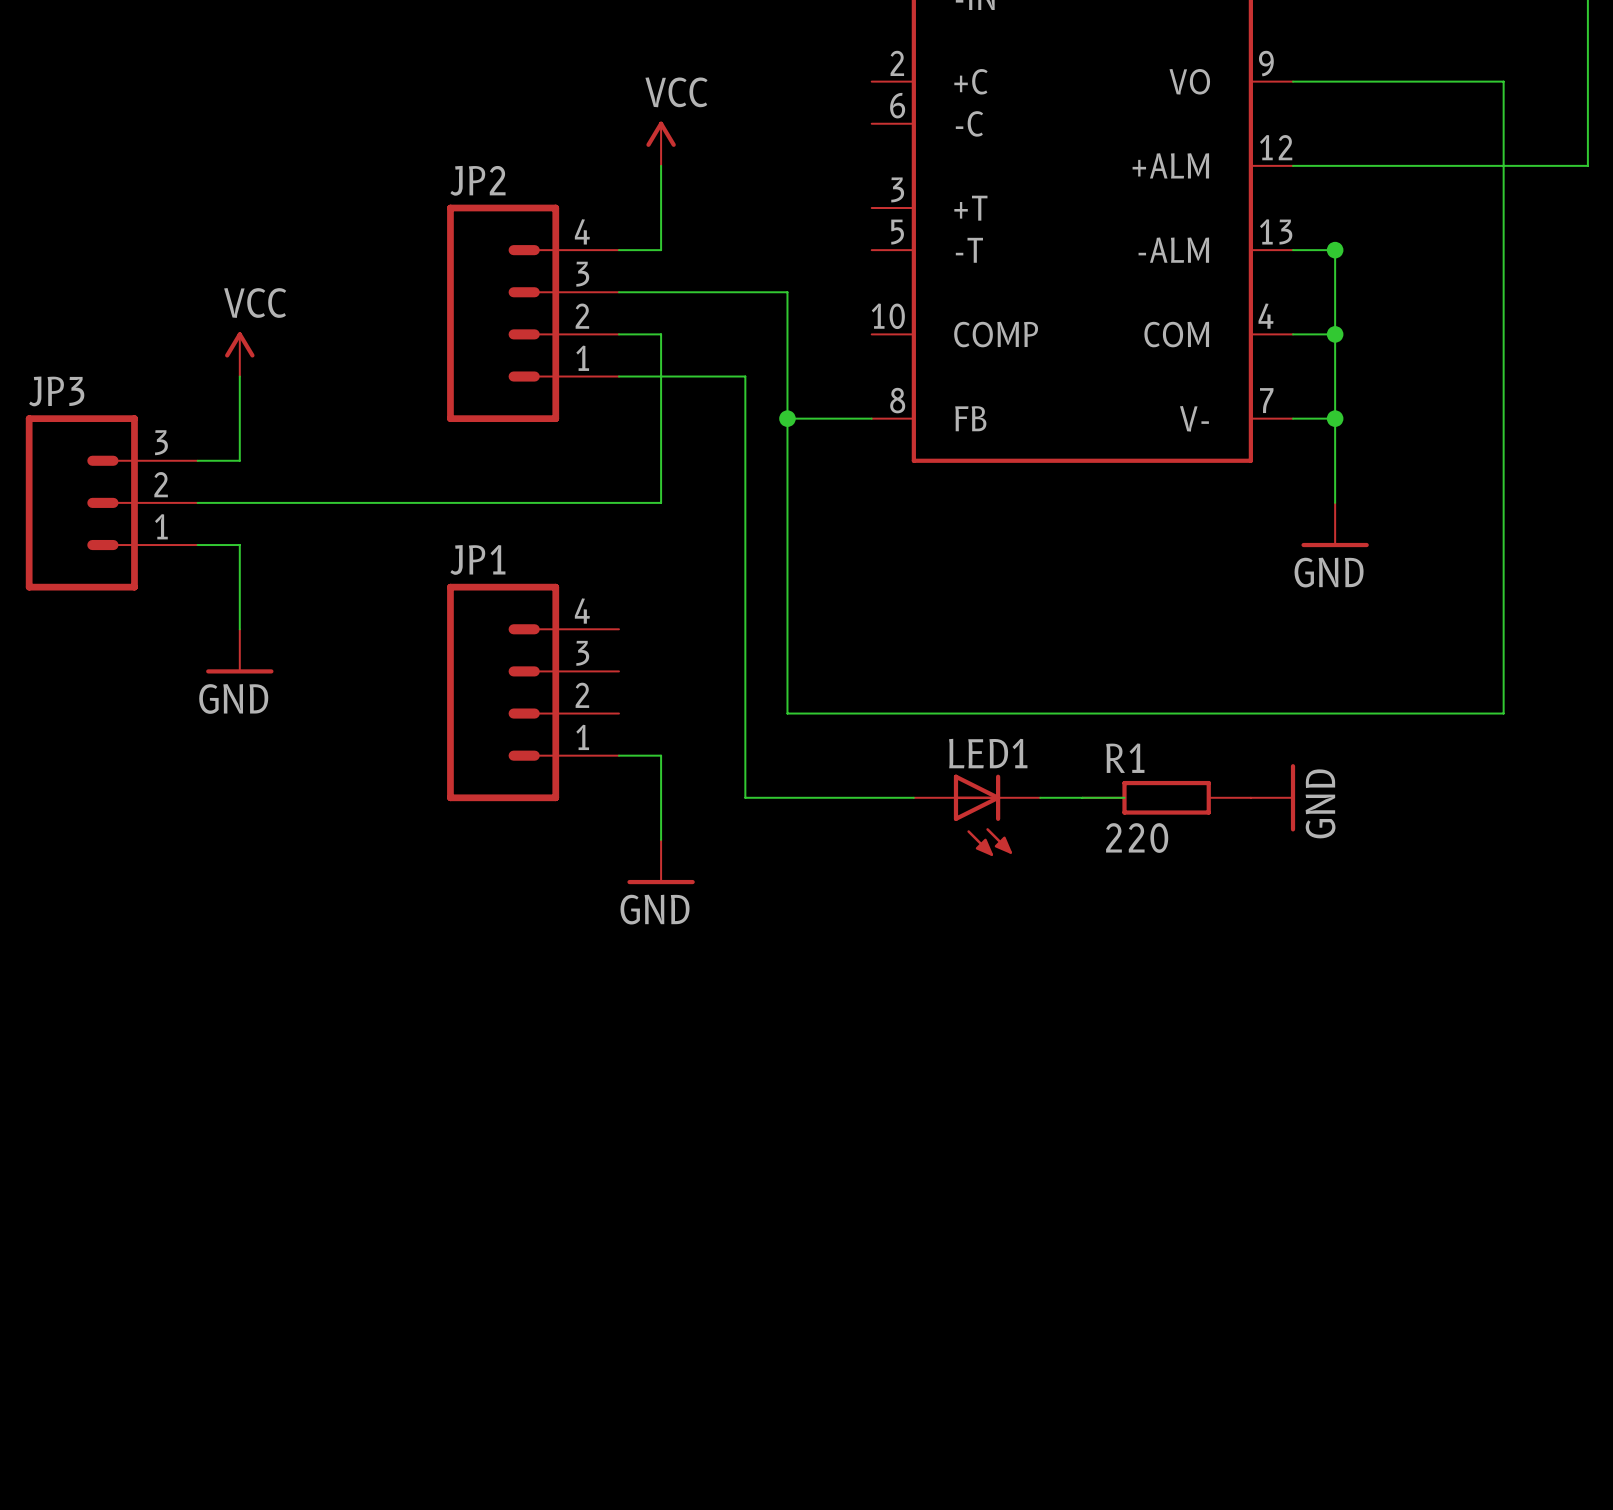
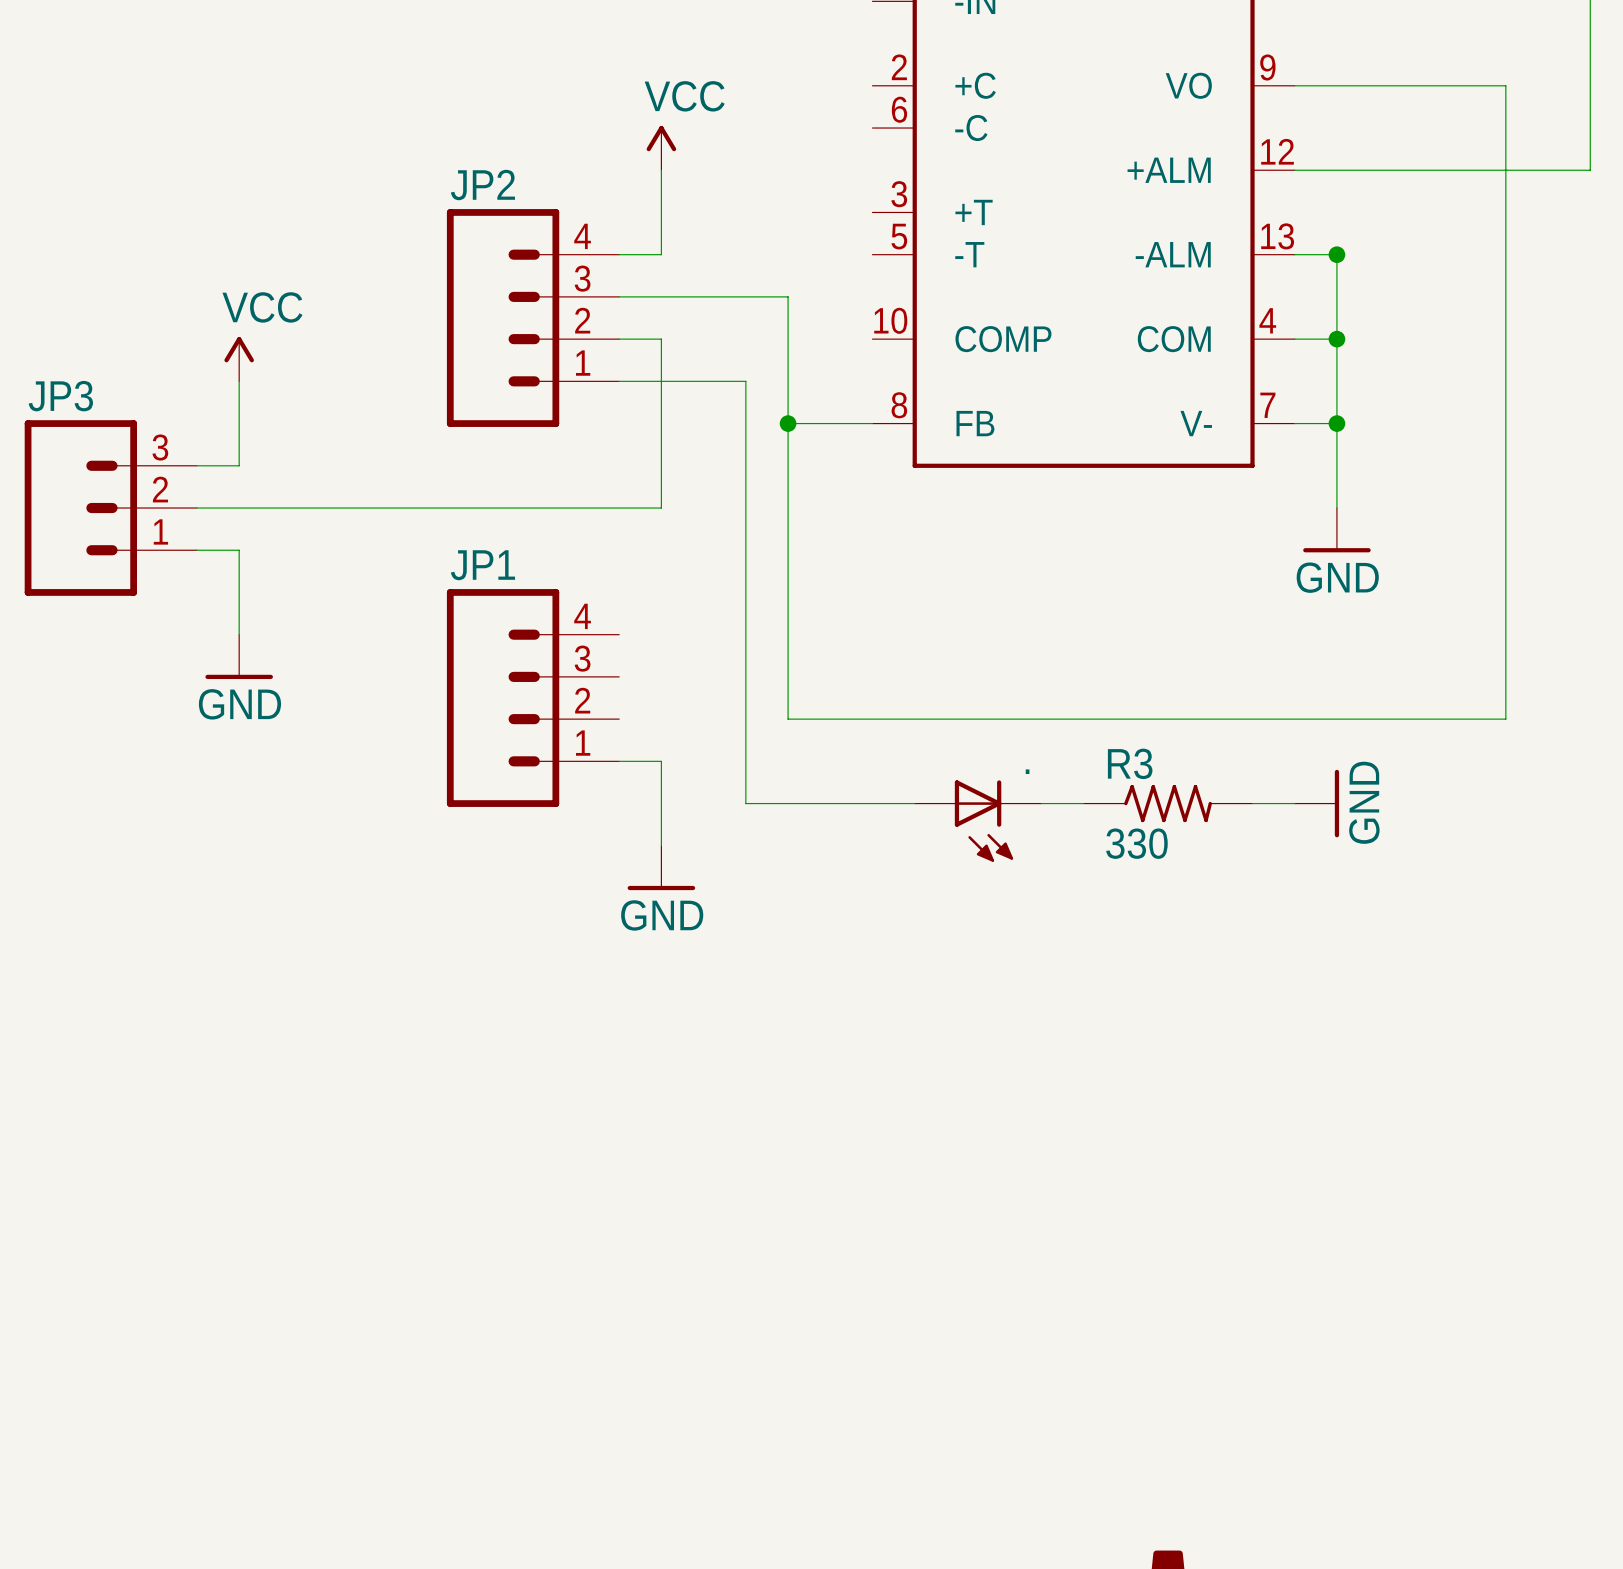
LED1 name: LED1 (988, 753) -> . (1027, 771)
R1: 220 (1166, 797) -> none
R3: none -> 330 (1168, 803)
power symbol position: GND (1273, 797) -> GND (1316, 803)

